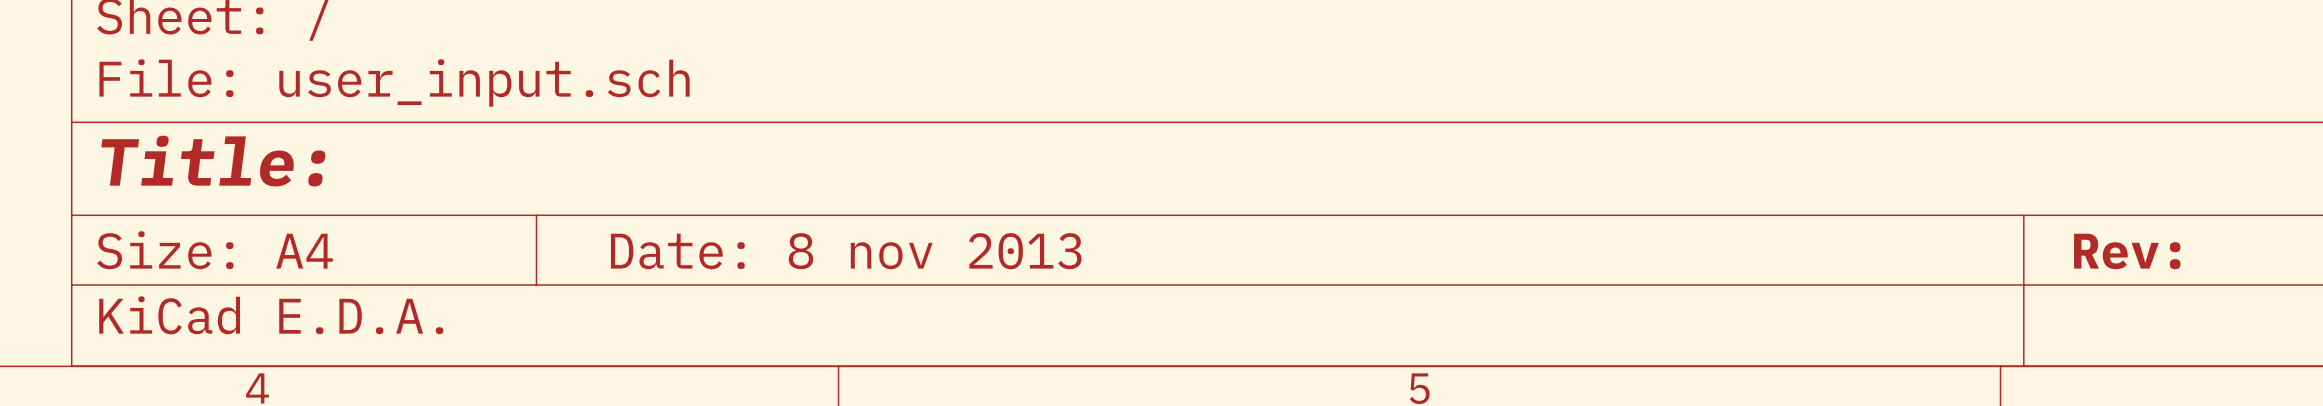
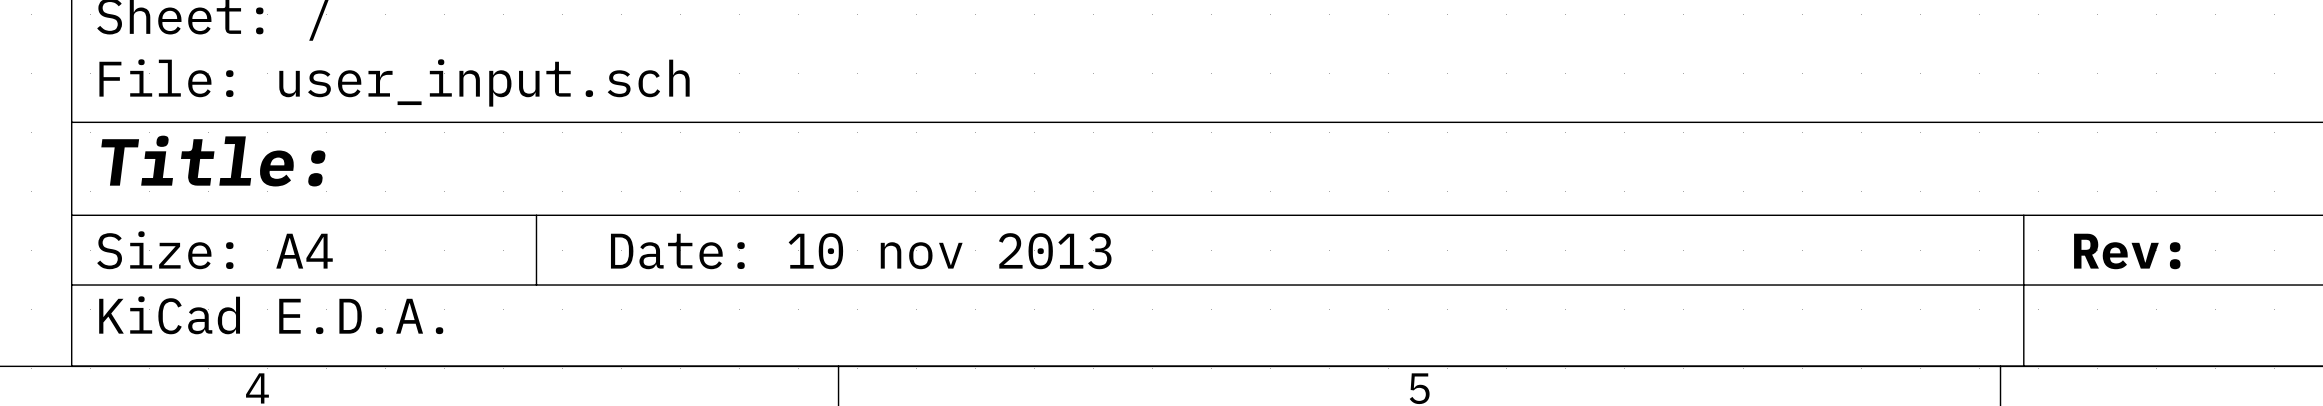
title block: Date: 8 nov 2013 (846, 251) -> Date: 10 nov 2013 (861, 251)

